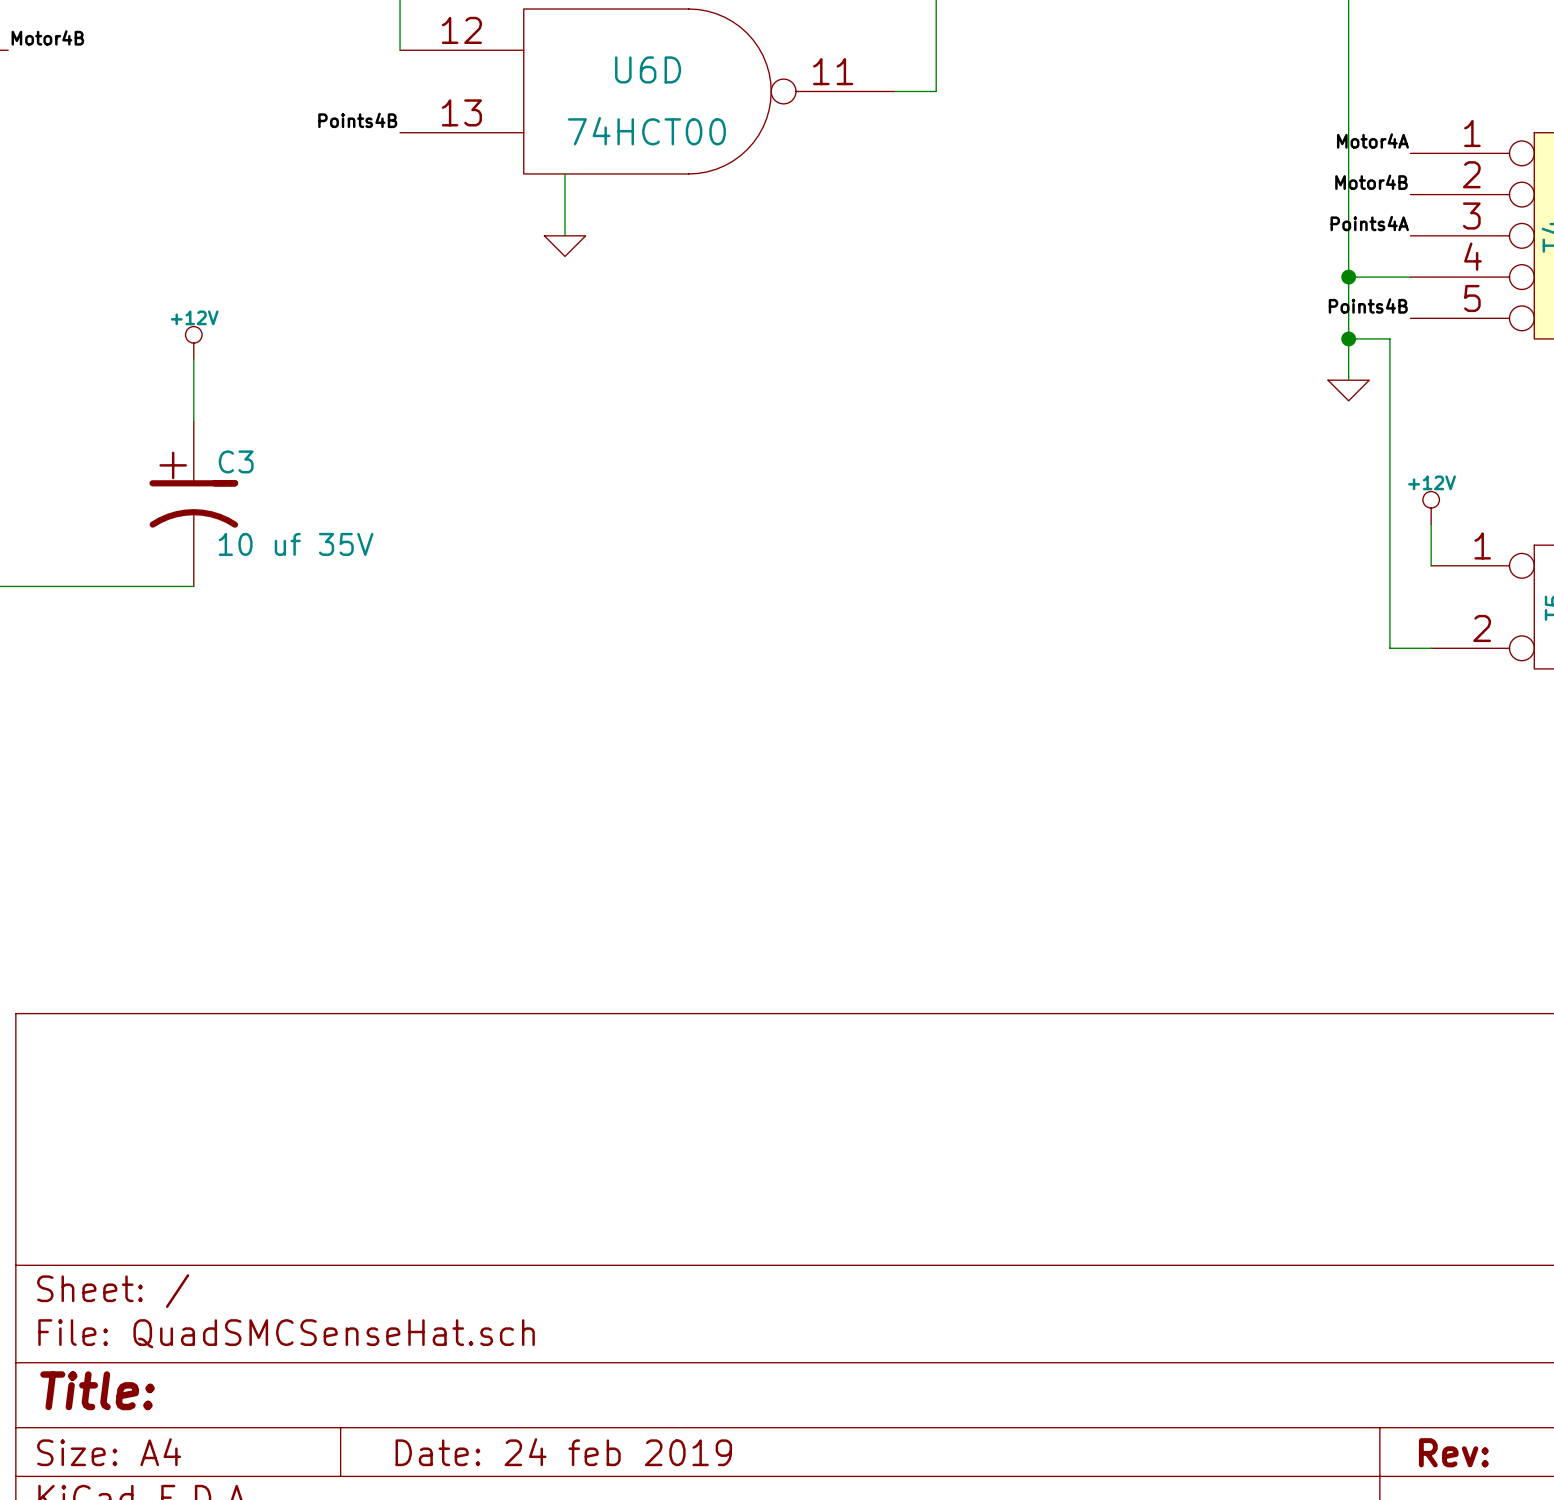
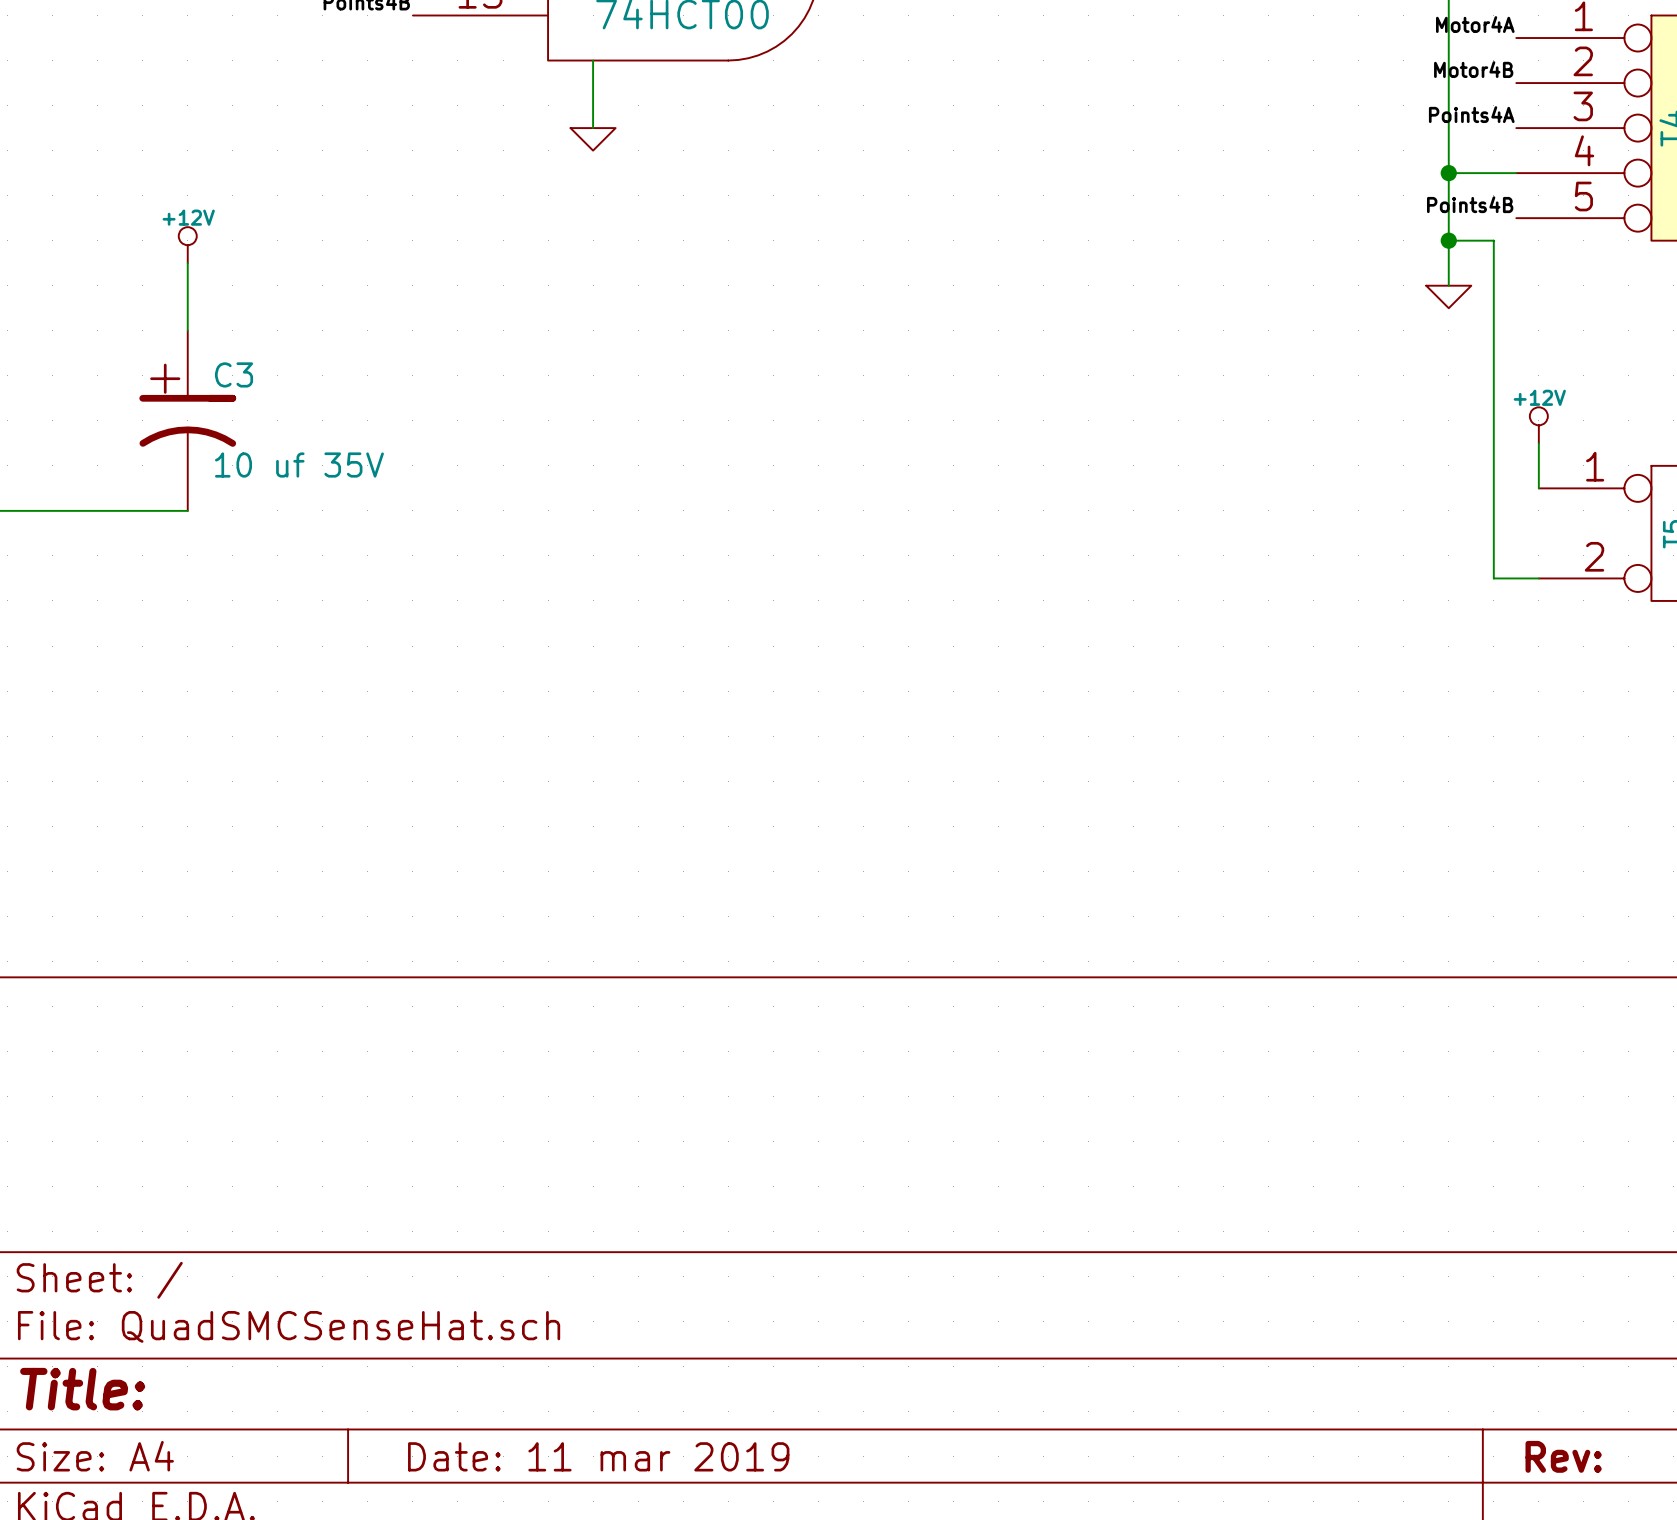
title block: Date: 24 feb 2019 (563, 1452) -> Date: 11 mar 2019 (598, 1456)

